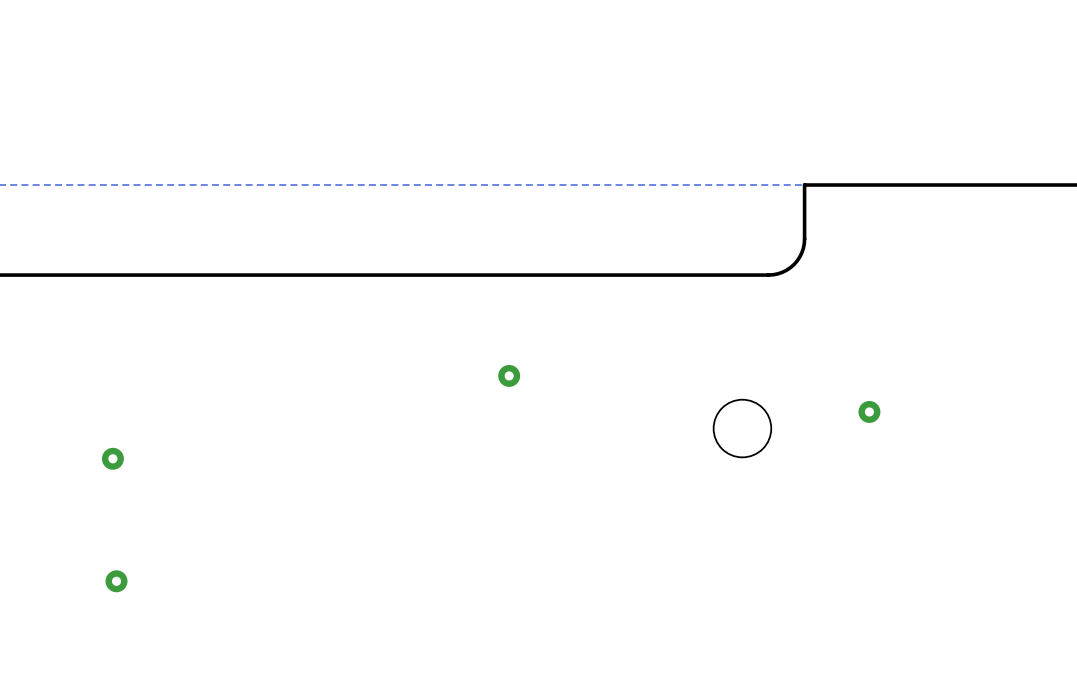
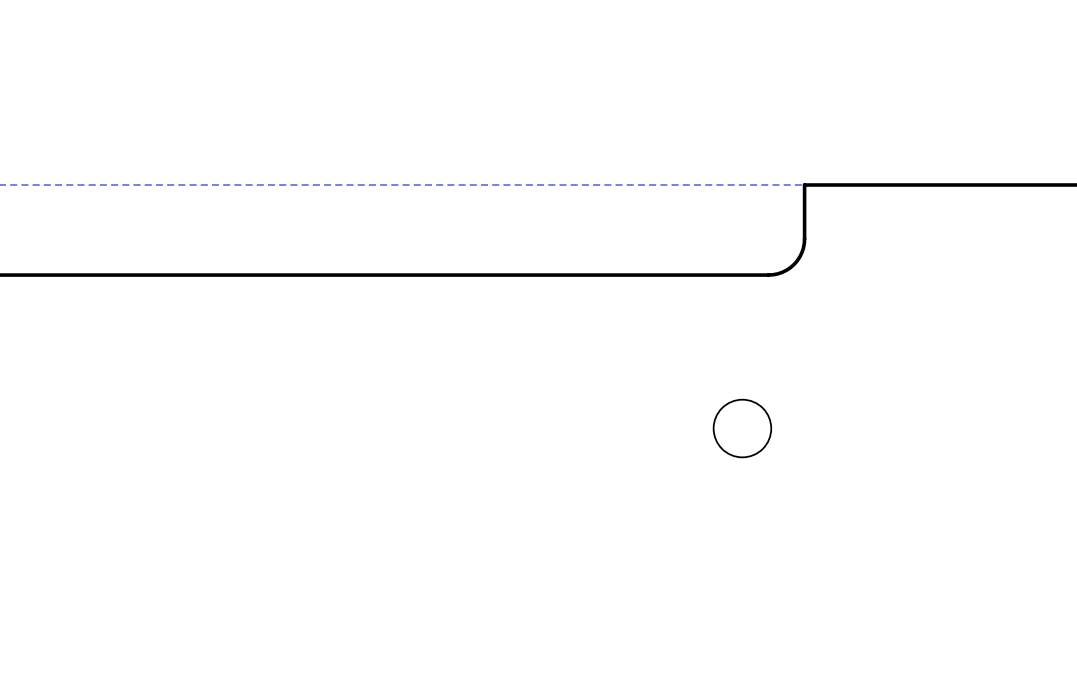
via: (509, 375) -> none
via: (869, 411) -> none
via: (112, 458) -> none
via: (116, 581) -> none

